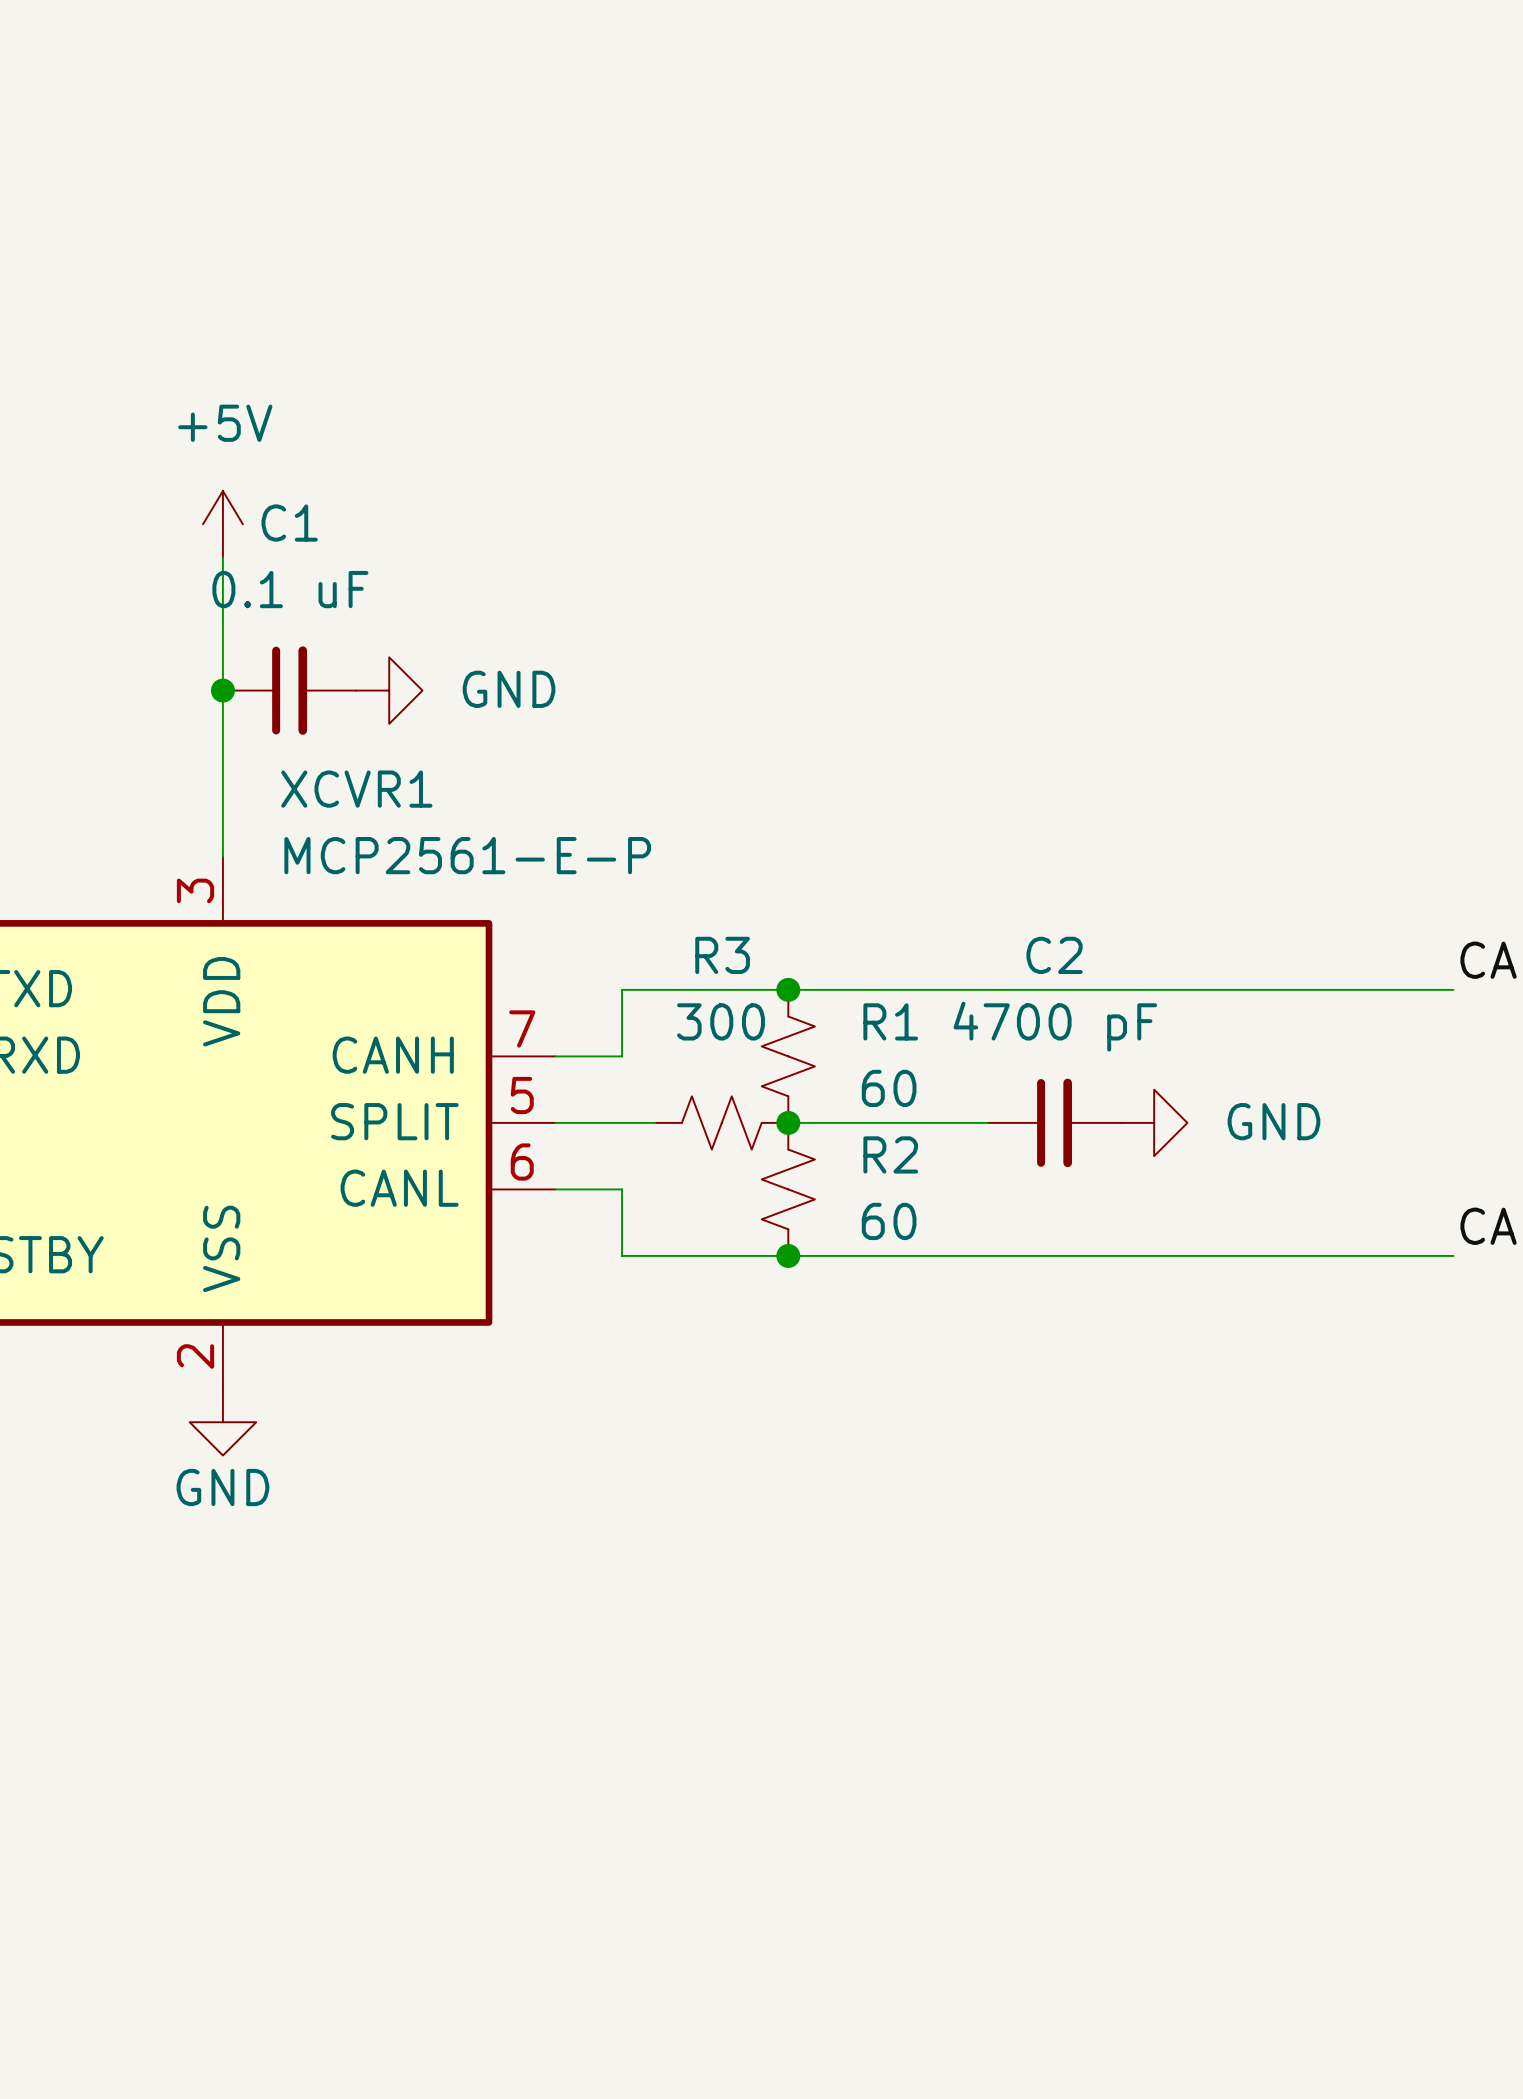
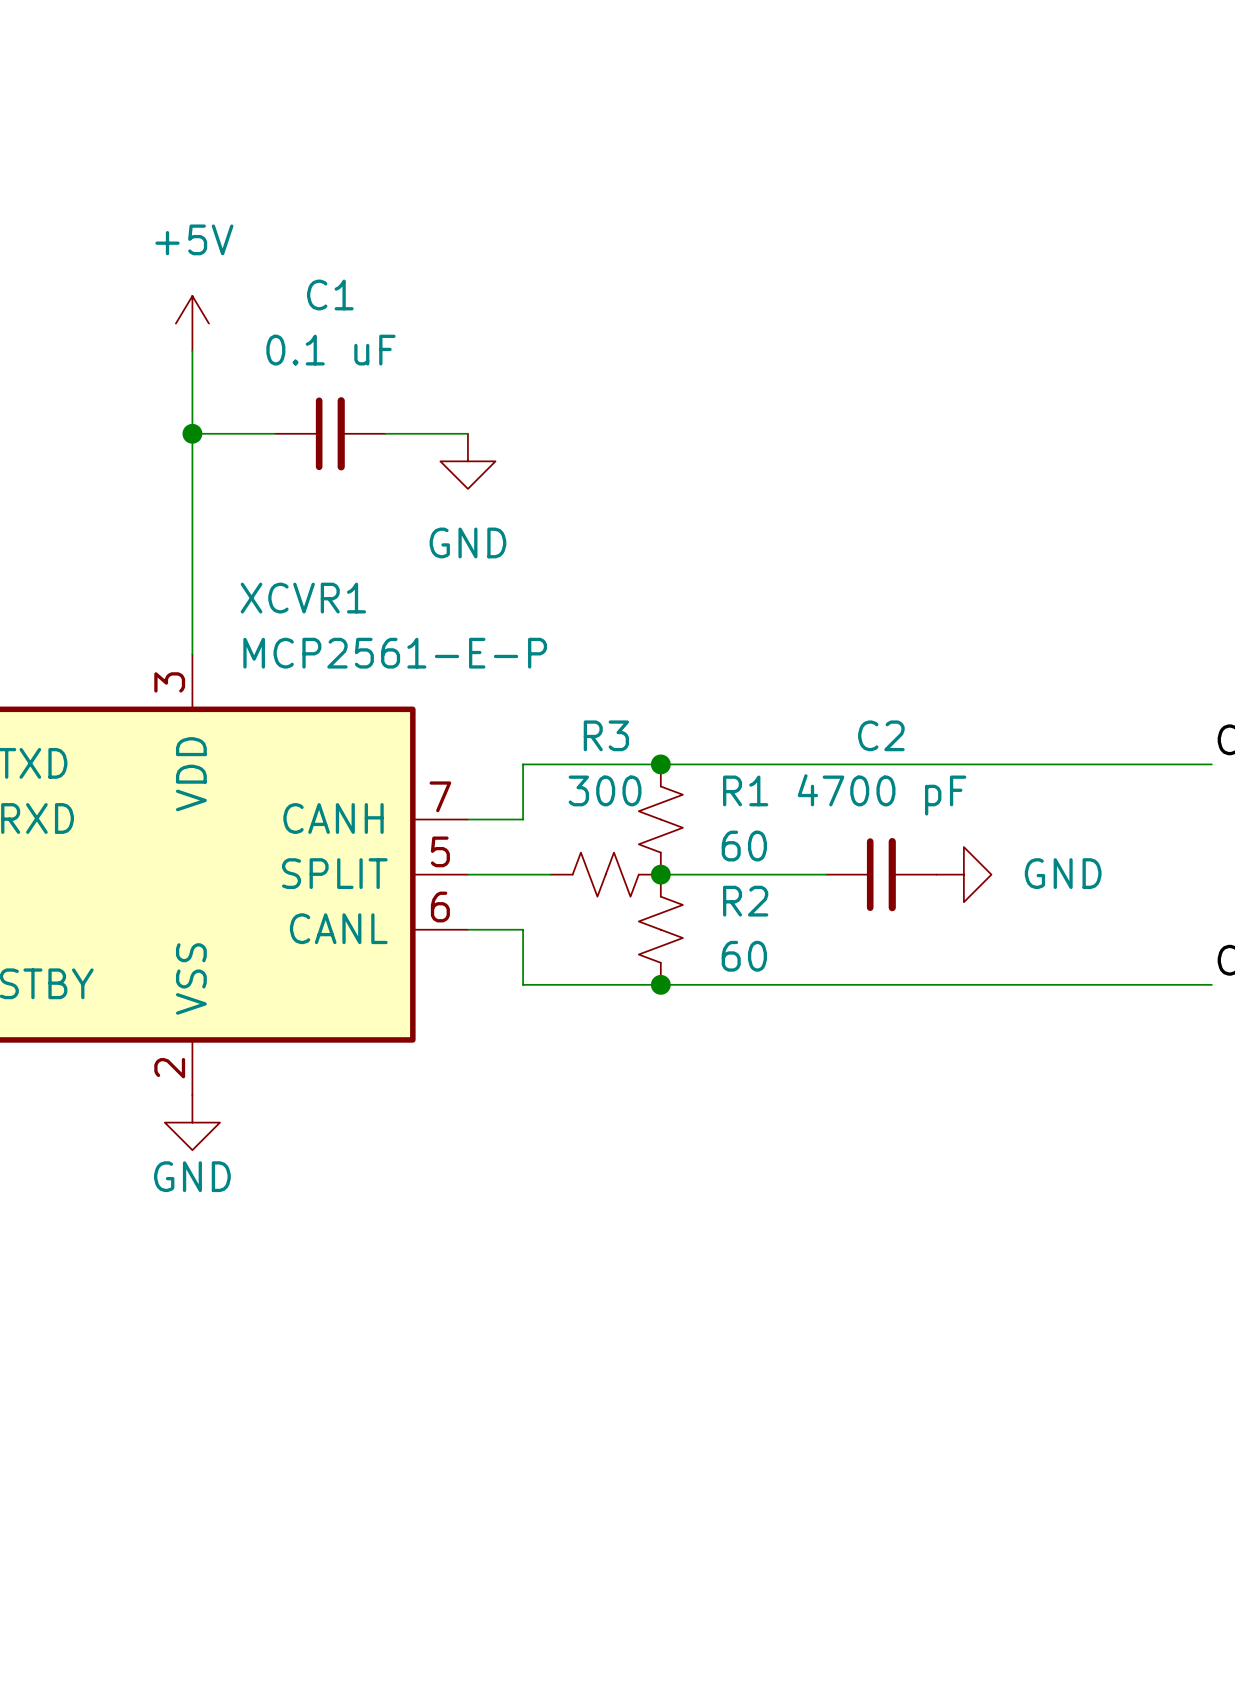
power symbol position: +5V (222, 524) -> +5V (192, 323)
wire: none -> (192, 433) (275, 433)
wire: none -> (385, 433) (467, 433)
junction position: (222, 690) -> (192, 433)
C1 position: (289, 690) -> (330, 433)
power symbol rotation: 0° (389, 690) -> 90° clockwise (467, 461)
power symbol position: GND (389, 690) -> GND (467, 461)

